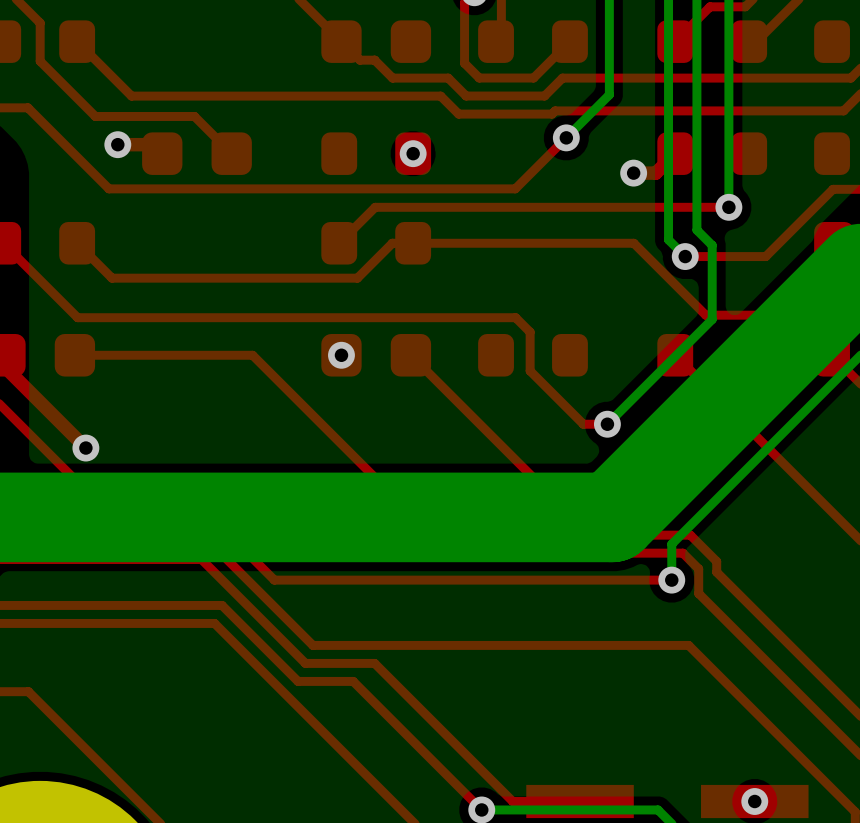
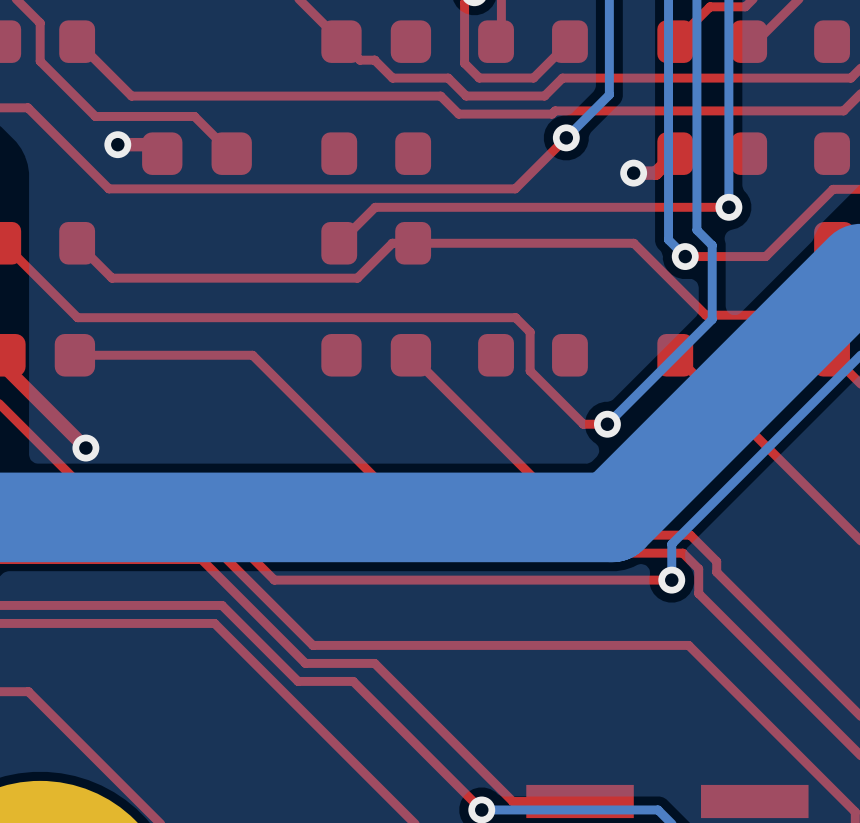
via: (413, 153) -> none
via: (341, 355) -> none
via: (754, 801) -> none

